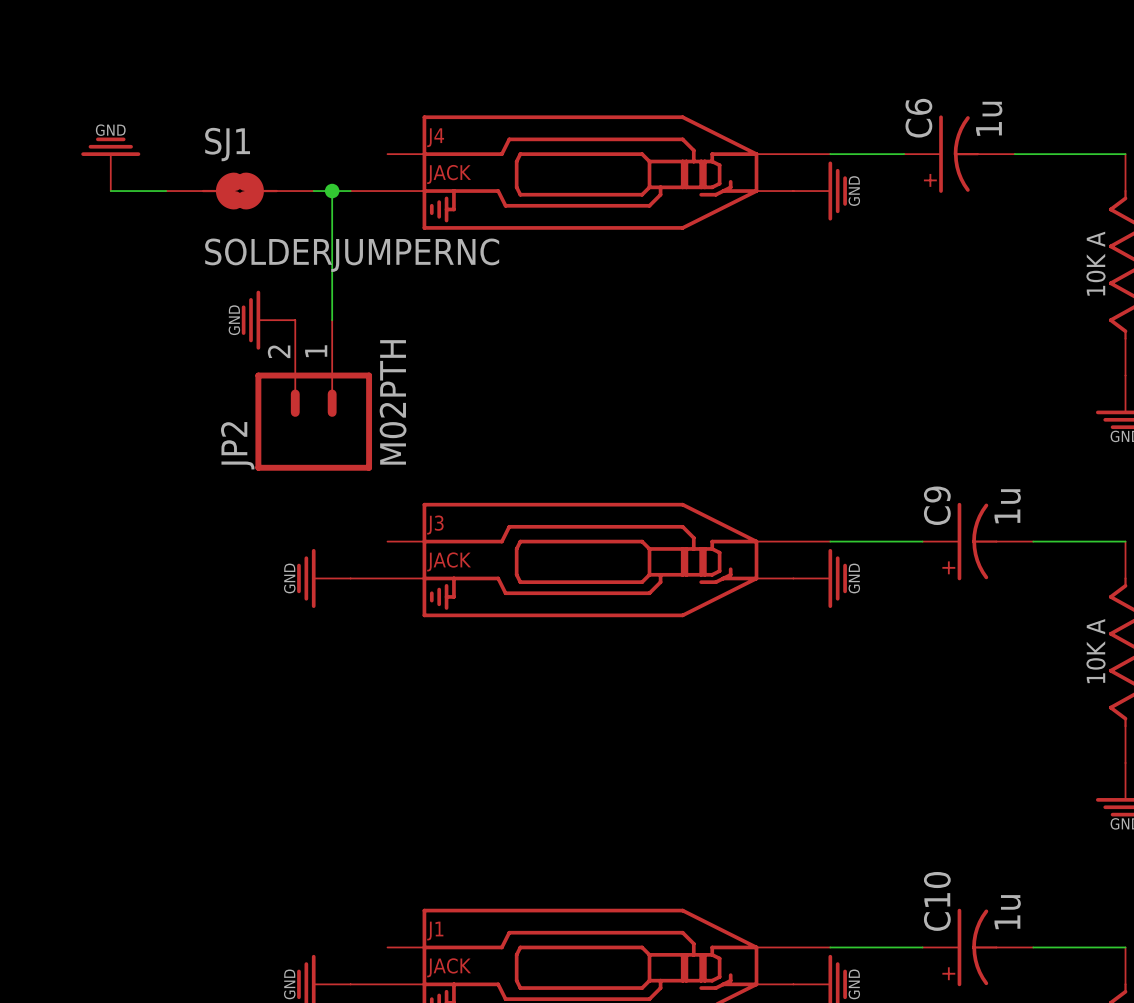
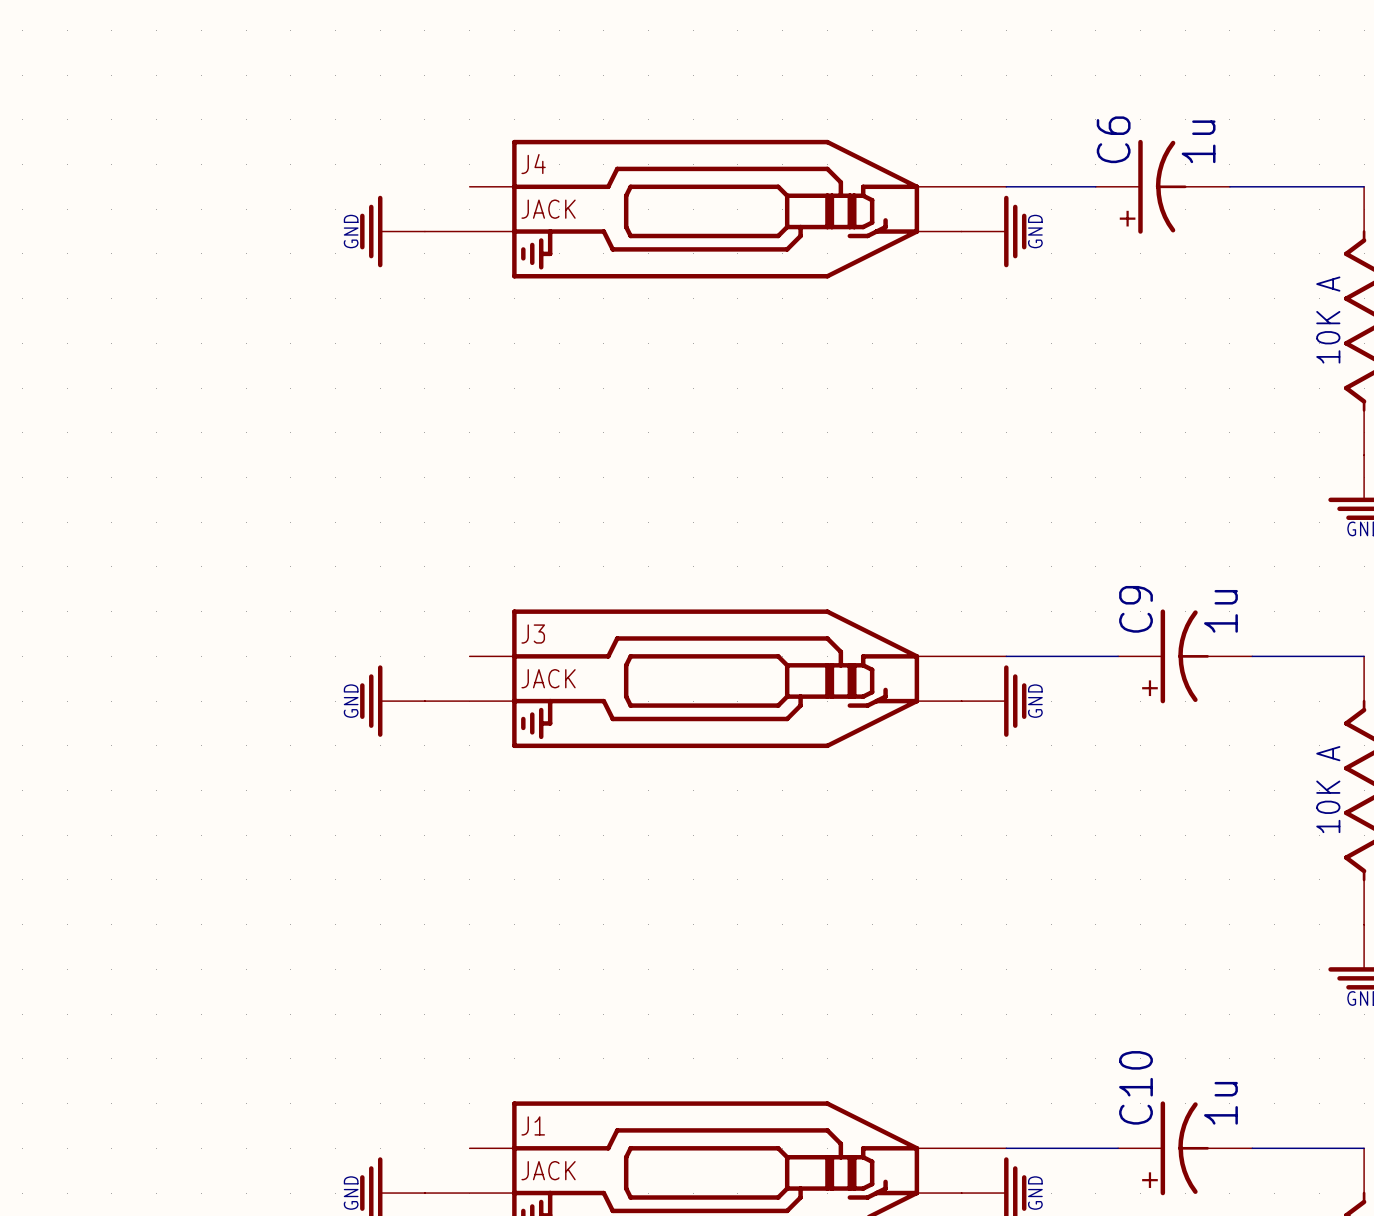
power symbol: GND (110, 164) -> none
wire: (110, 191) (166, 191) -> none
SJ1: SOLDERJUMPERNC (239, 191) -> none
power symbol: none -> GND (392, 231)
wire: (332, 191) (332, 320) -> none
junction: (332, 191) -> none
power symbol: GND (268, 320) -> none
JP2: M02PTH (313, 395) -> none

